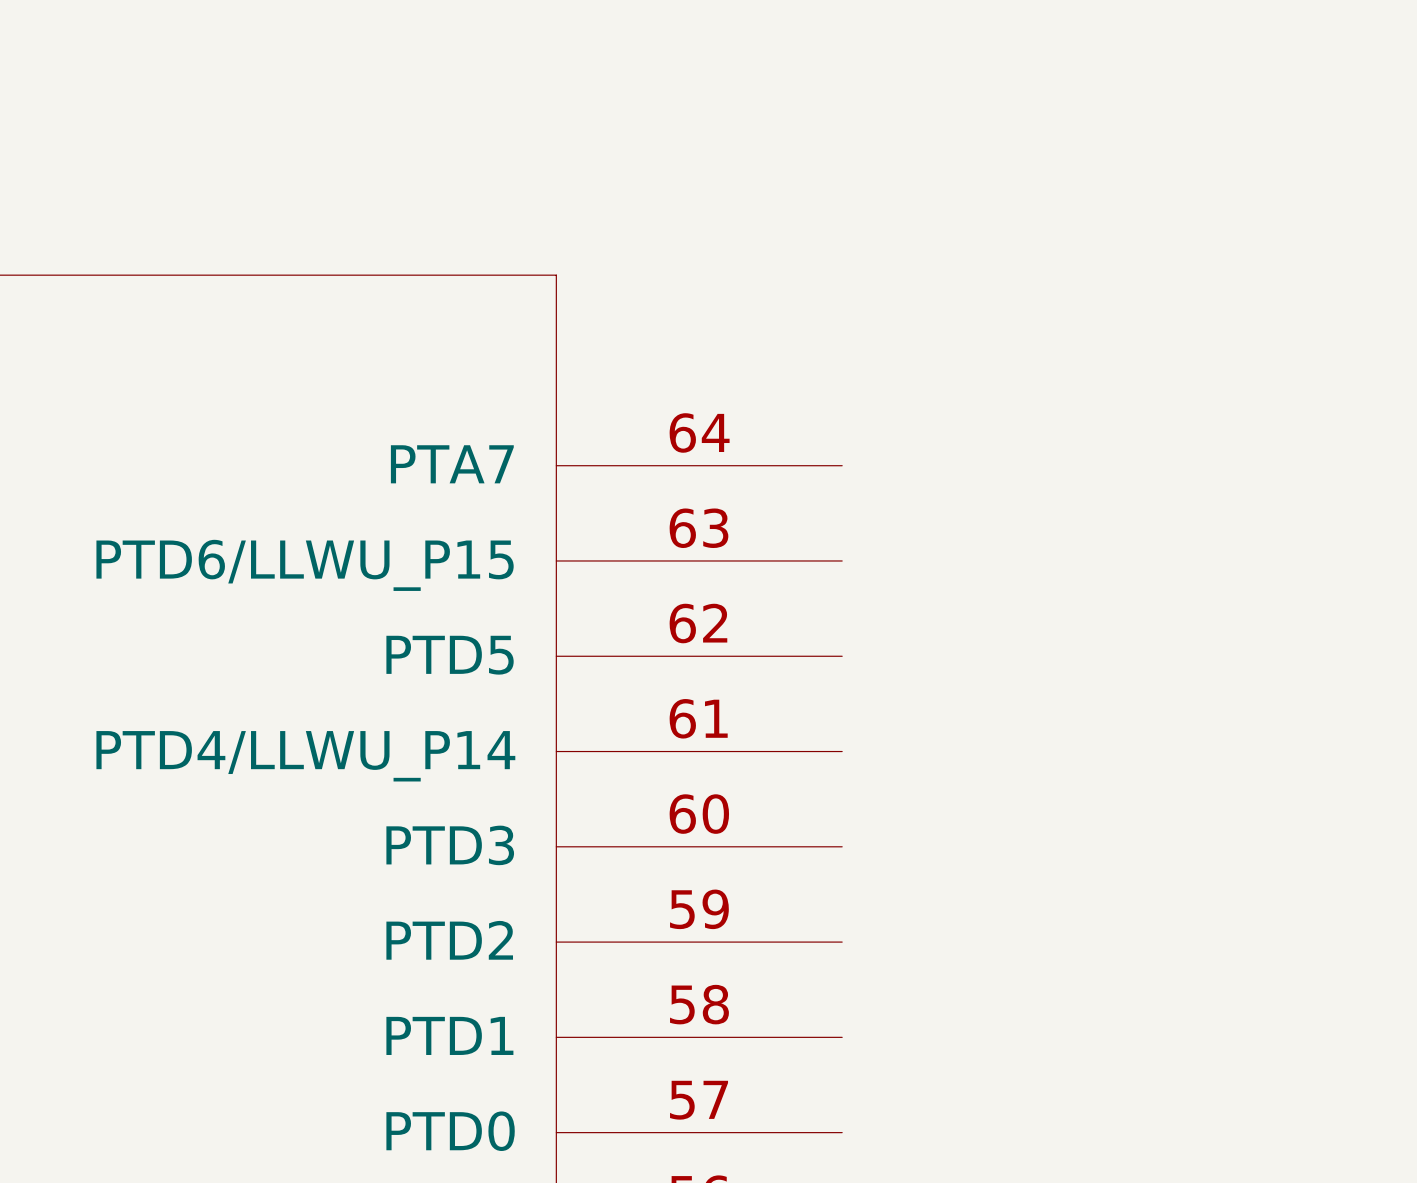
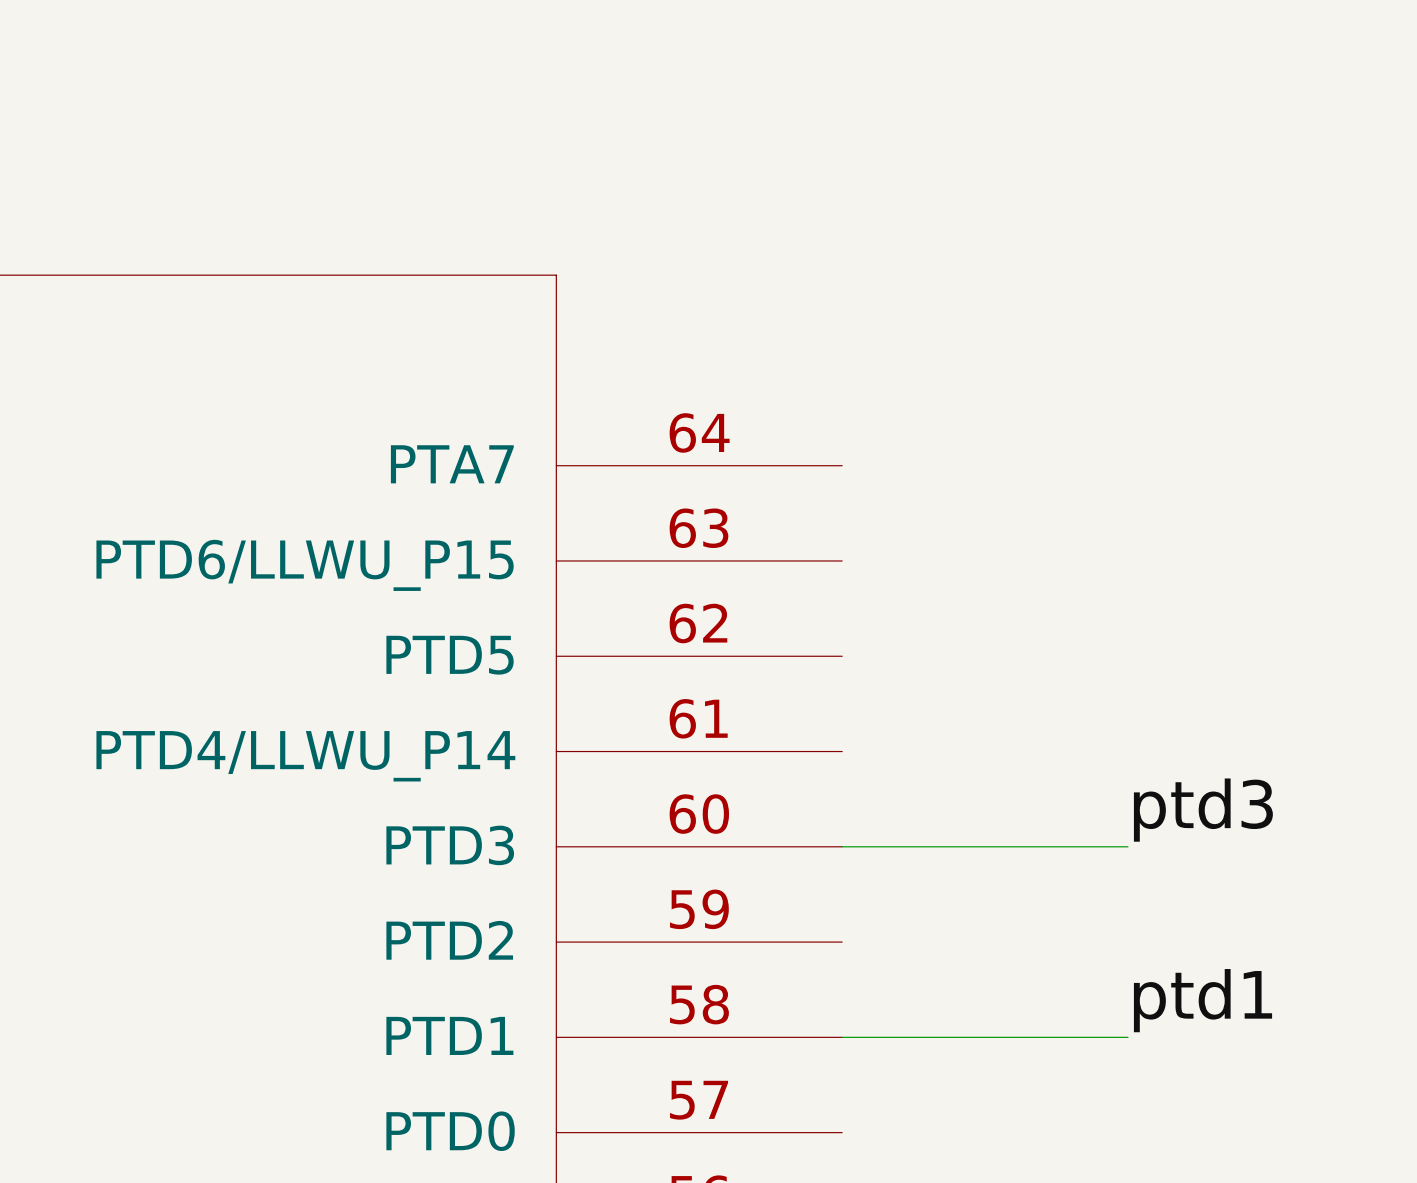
label: none -> ptd3 (1203, 810)
wire: none -> (842, 846) (1127, 846)
label: none -> ptd1 (1203, 1000)
wire: none -> (842, 1037) (1127, 1037)

